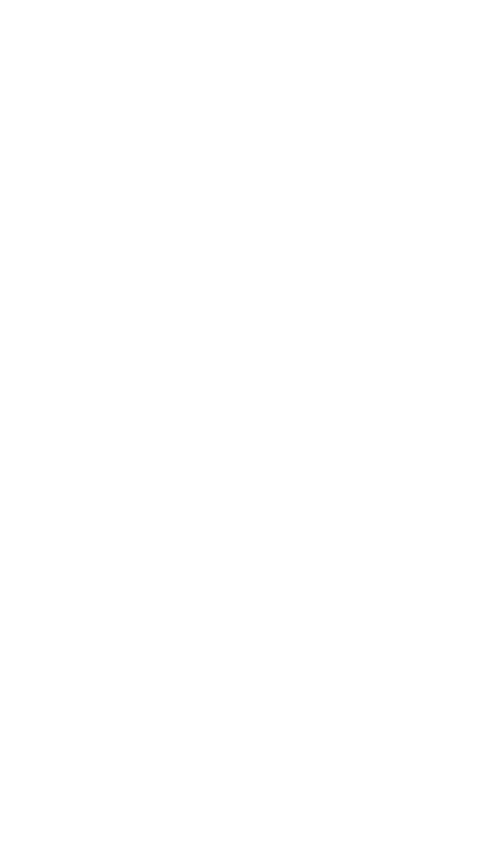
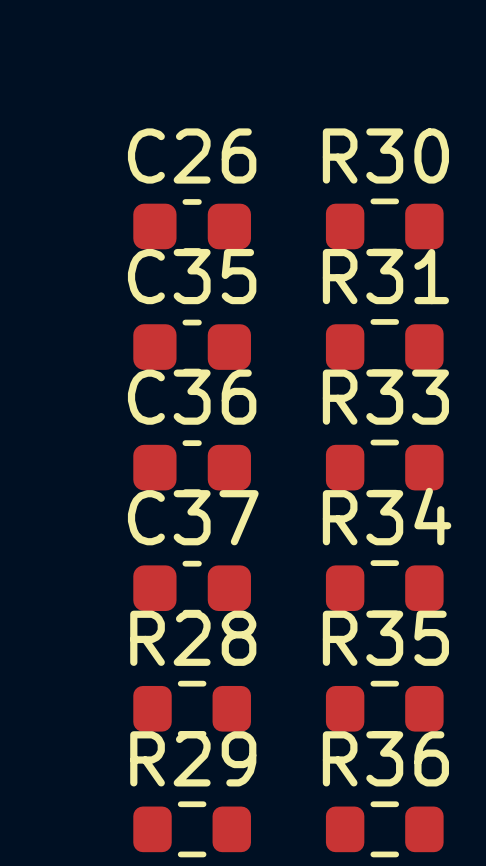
C26: none -> (192, 226)
R30: none -> (384, 226)
C35: none -> (192, 347)
R31: none -> (384, 347)
C36: none -> (192, 467)
R33: none -> (384, 467)
C37: none -> (192, 588)
R34: none -> (384, 588)
R28: none -> (192, 708)
R35: none -> (384, 708)
R29: none -> (192, 829)
R36: none -> (384, 829)

